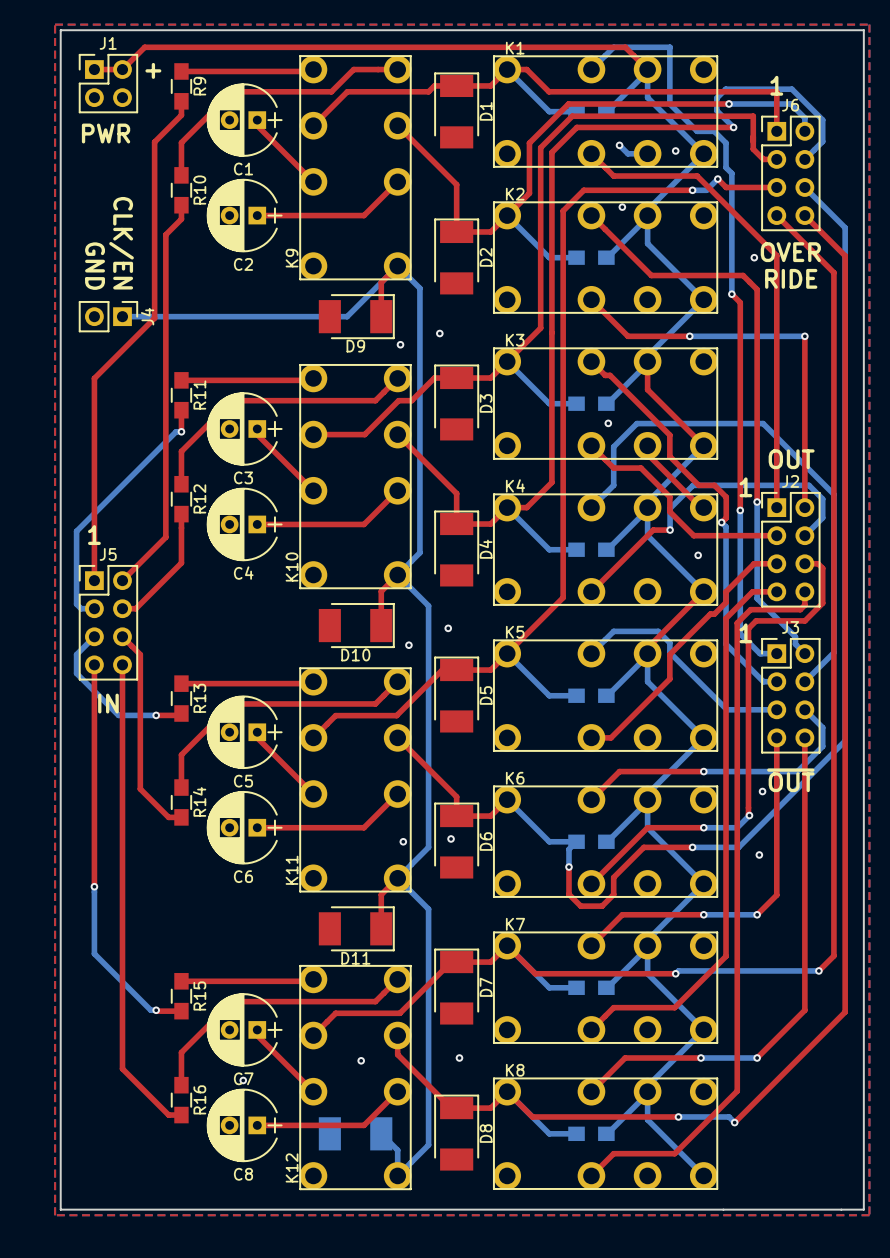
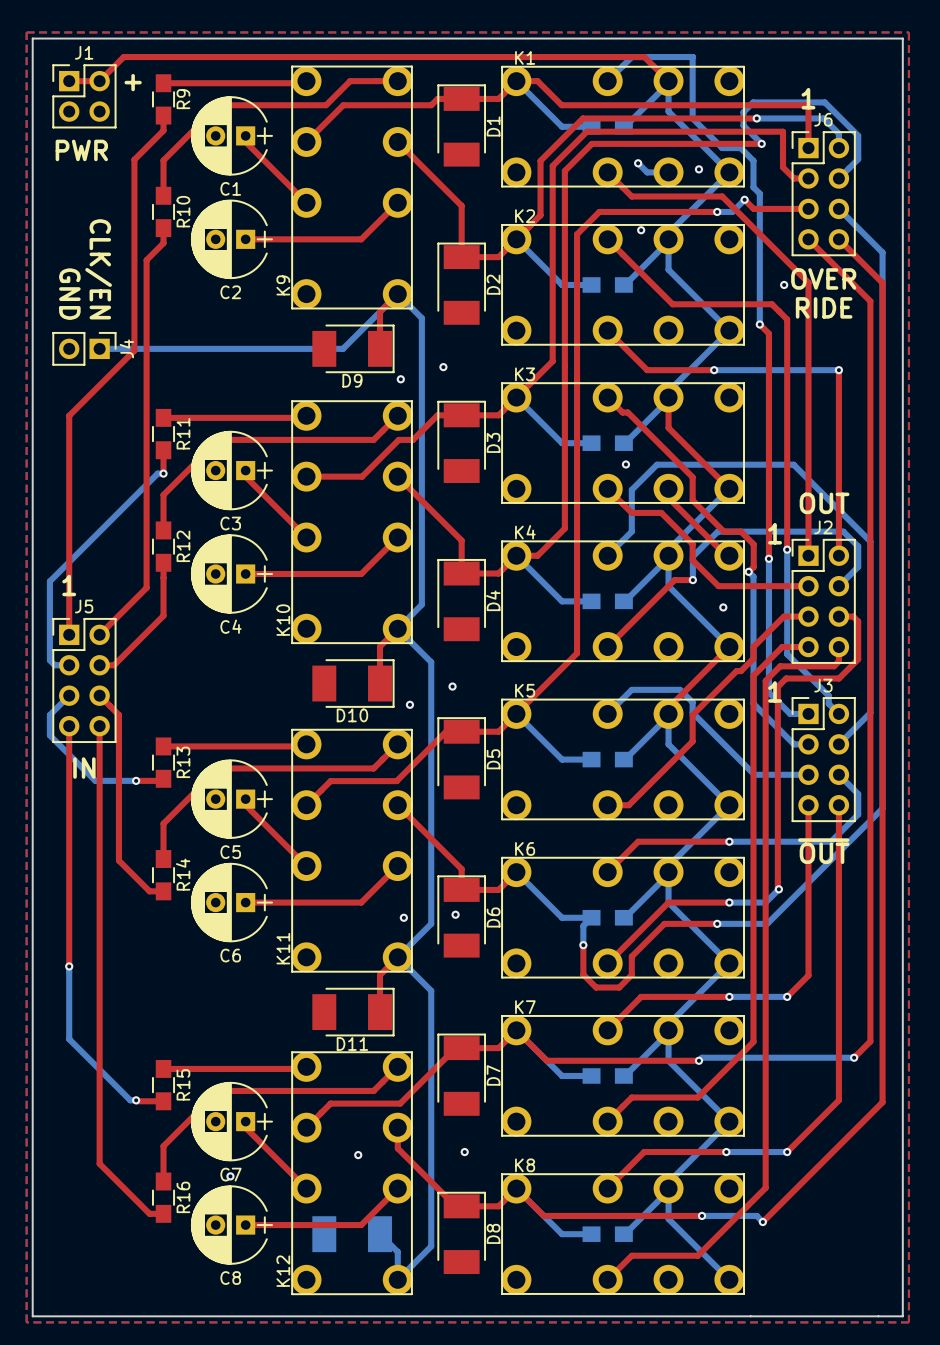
via: (762, 791) -> none
via: (759, 854) -> none

